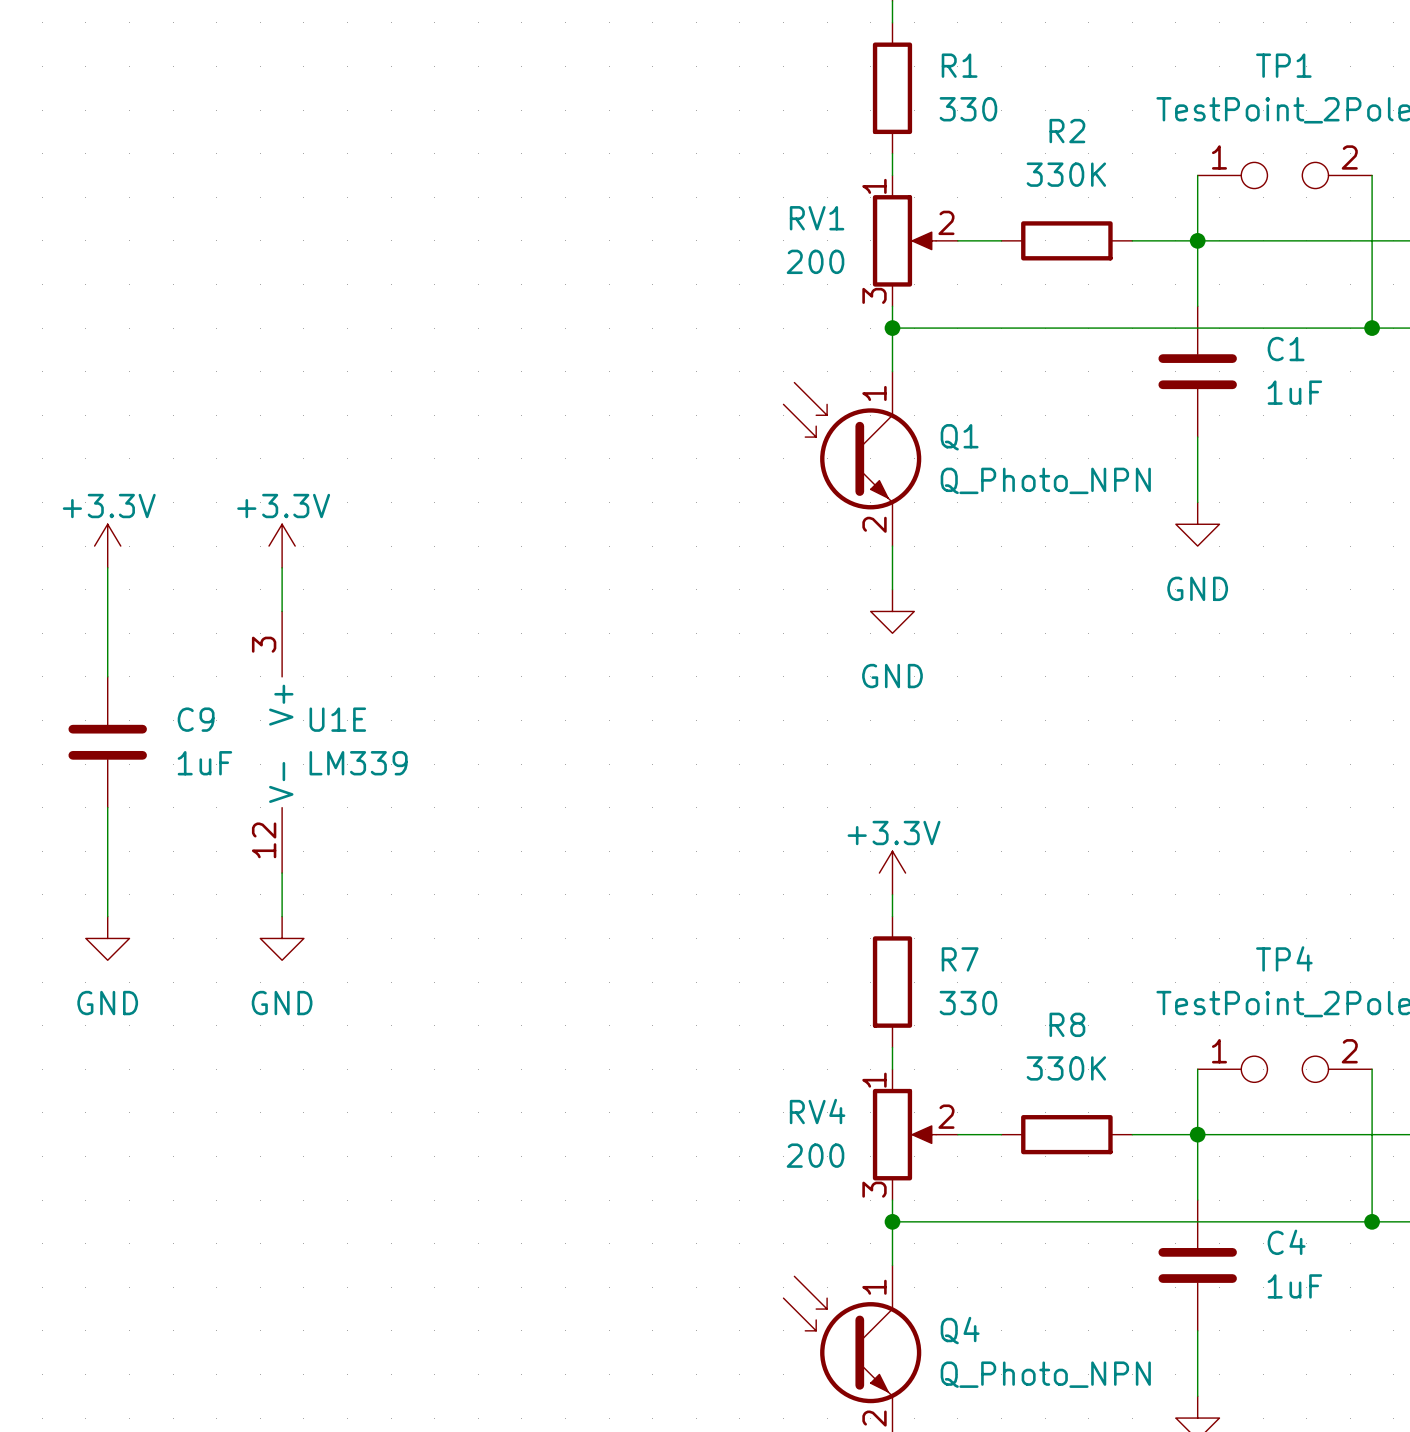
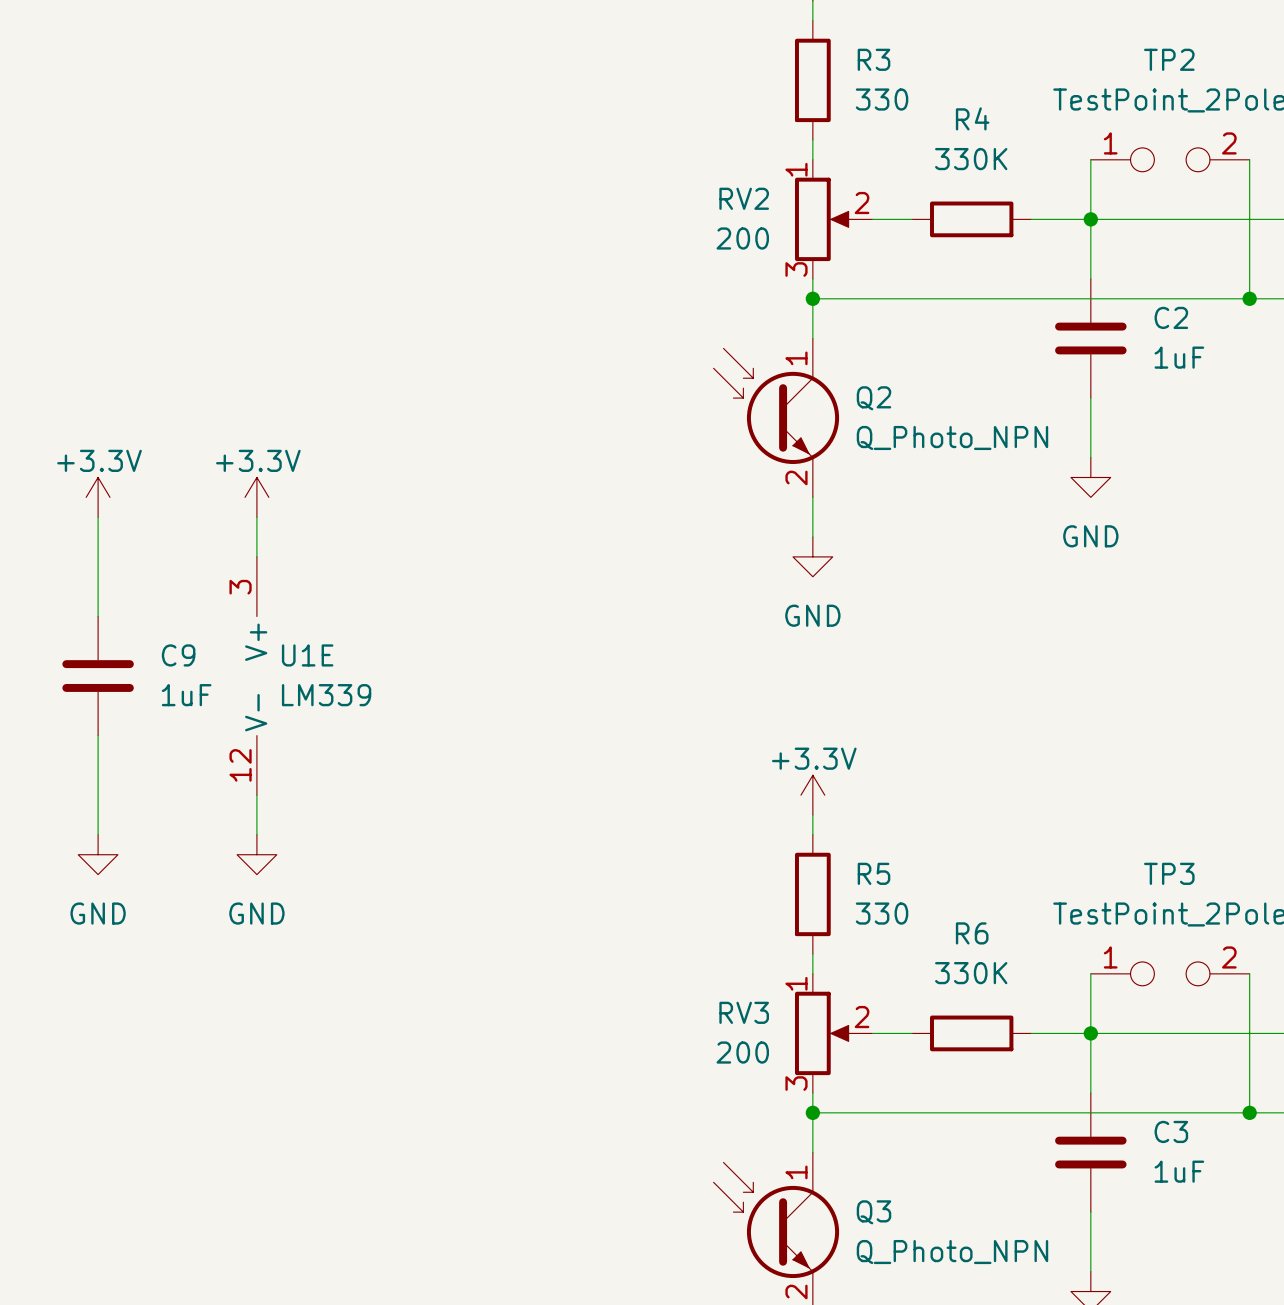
R1 name: R1 (959, 65) -> R3 (874, 59)
TP1 name: TP1 (1283, 65) -> TP2 (1169, 59)
R2 name: R2 (1067, 131) -> R4 (972, 118)
RV1 name: RV1 (817, 218) -> RV2 (744, 198)
C1 name: C1 (1286, 349) -> C2 (1171, 317)
Q1 name: Q1 (959, 437) -> Q2 (874, 398)
TP4 name: TP4 (1284, 958) -> TP3 (1169, 873)
R7 name: R7 (960, 959) -> R5 (874, 873)
R8 name: R8 (1067, 1024) -> R6 (972, 933)
RV4 name: RV4 (817, 1111) -> RV3 (744, 1012)
C4 name: C4 (1286, 1242) -> C3 (1171, 1131)
Q4 name: Q4 (960, 1330) -> Q3 (874, 1212)

